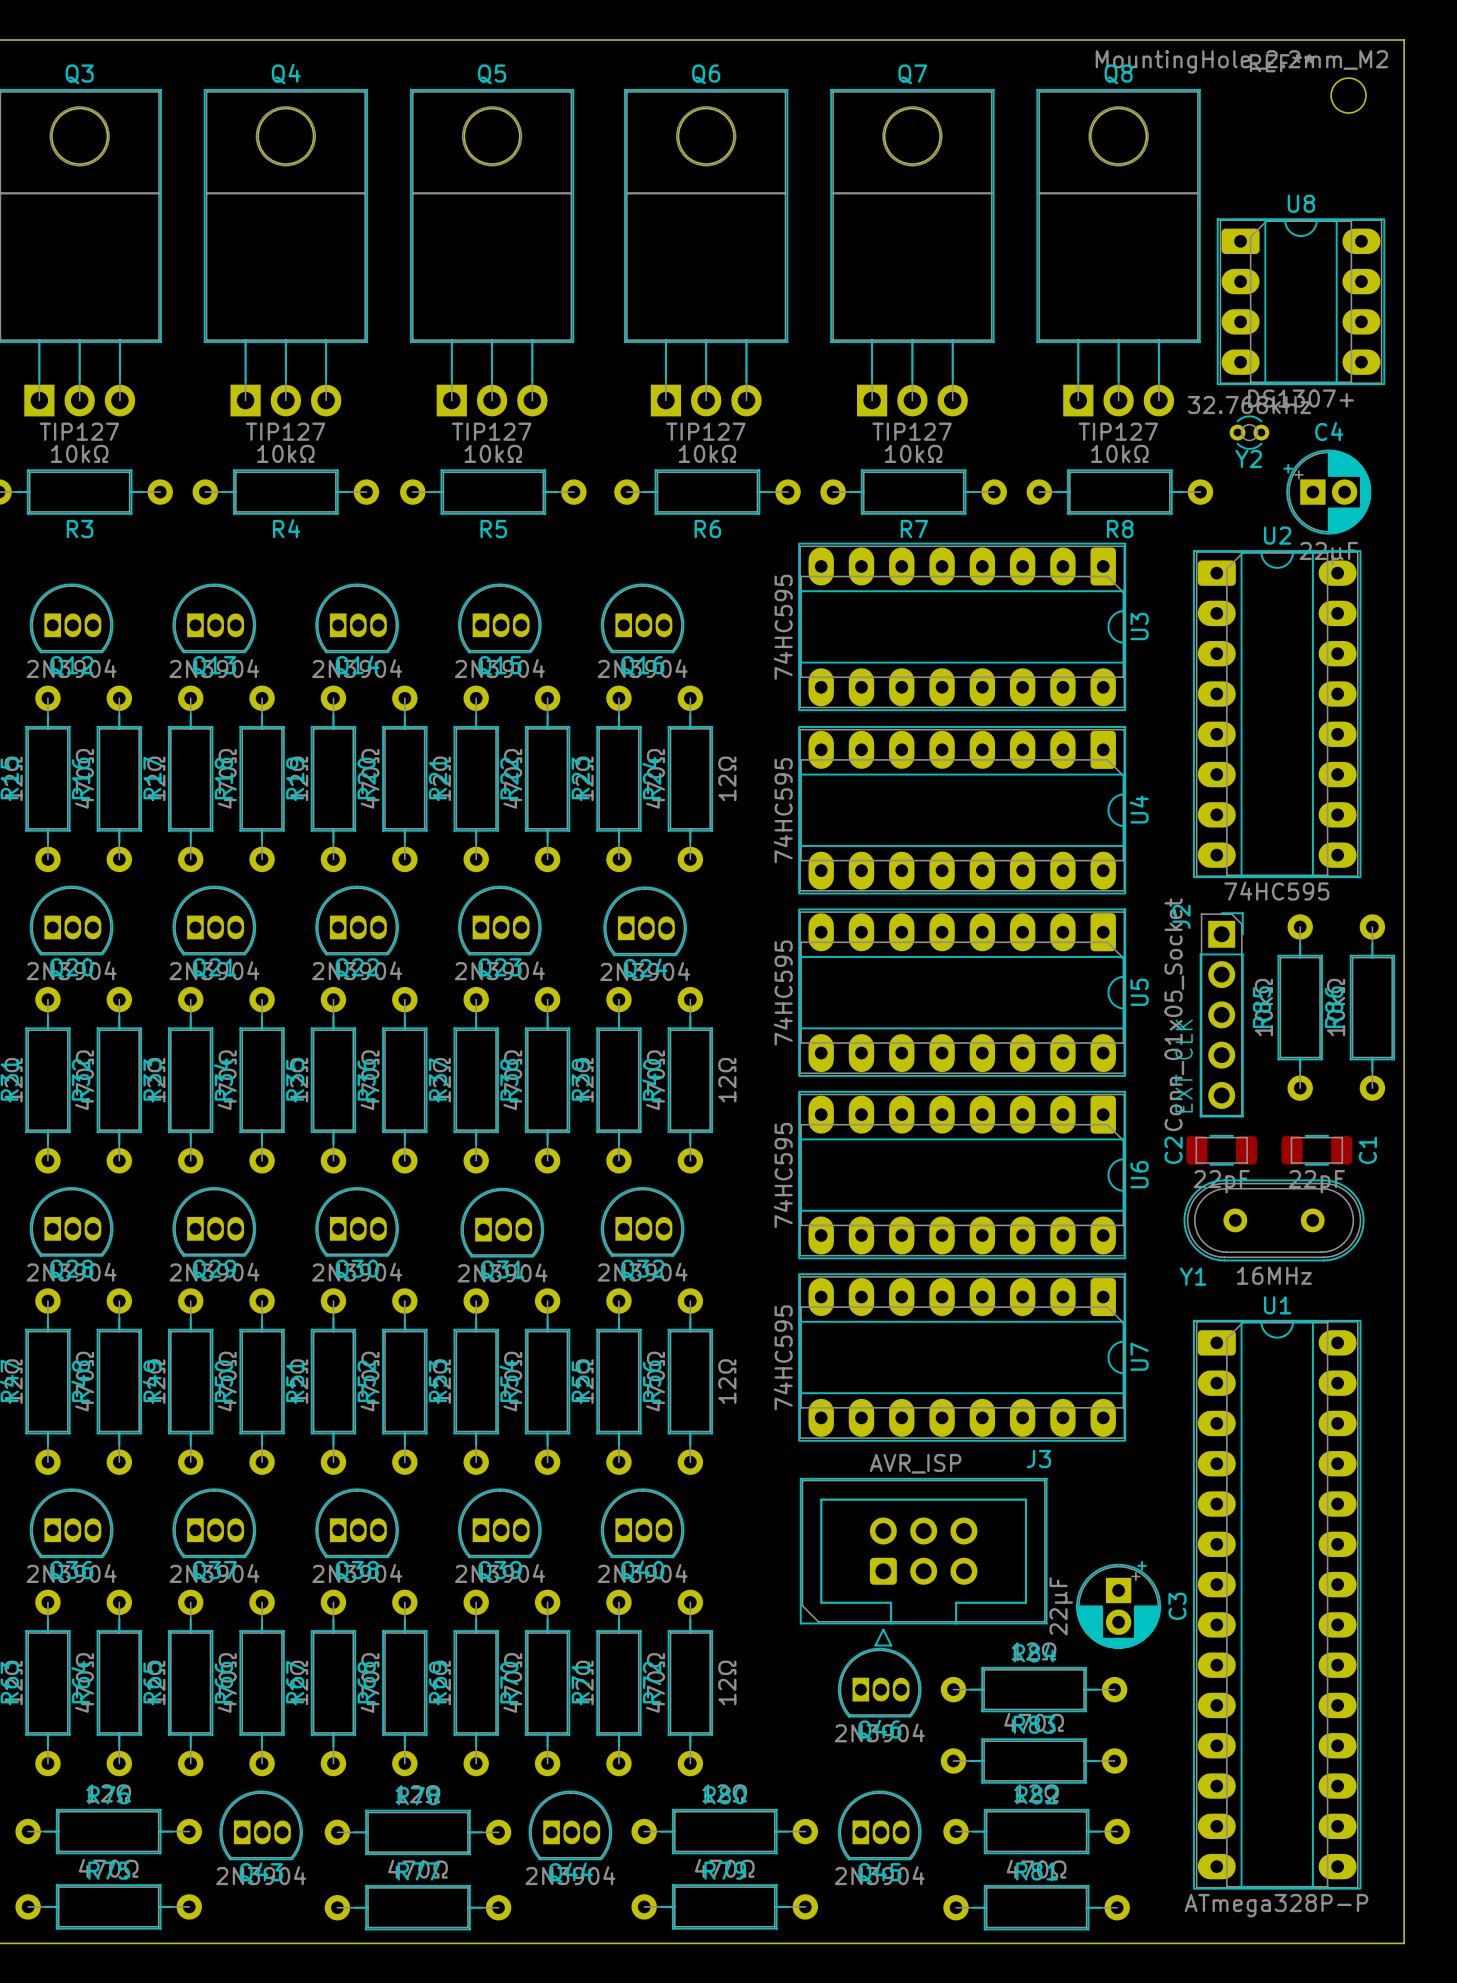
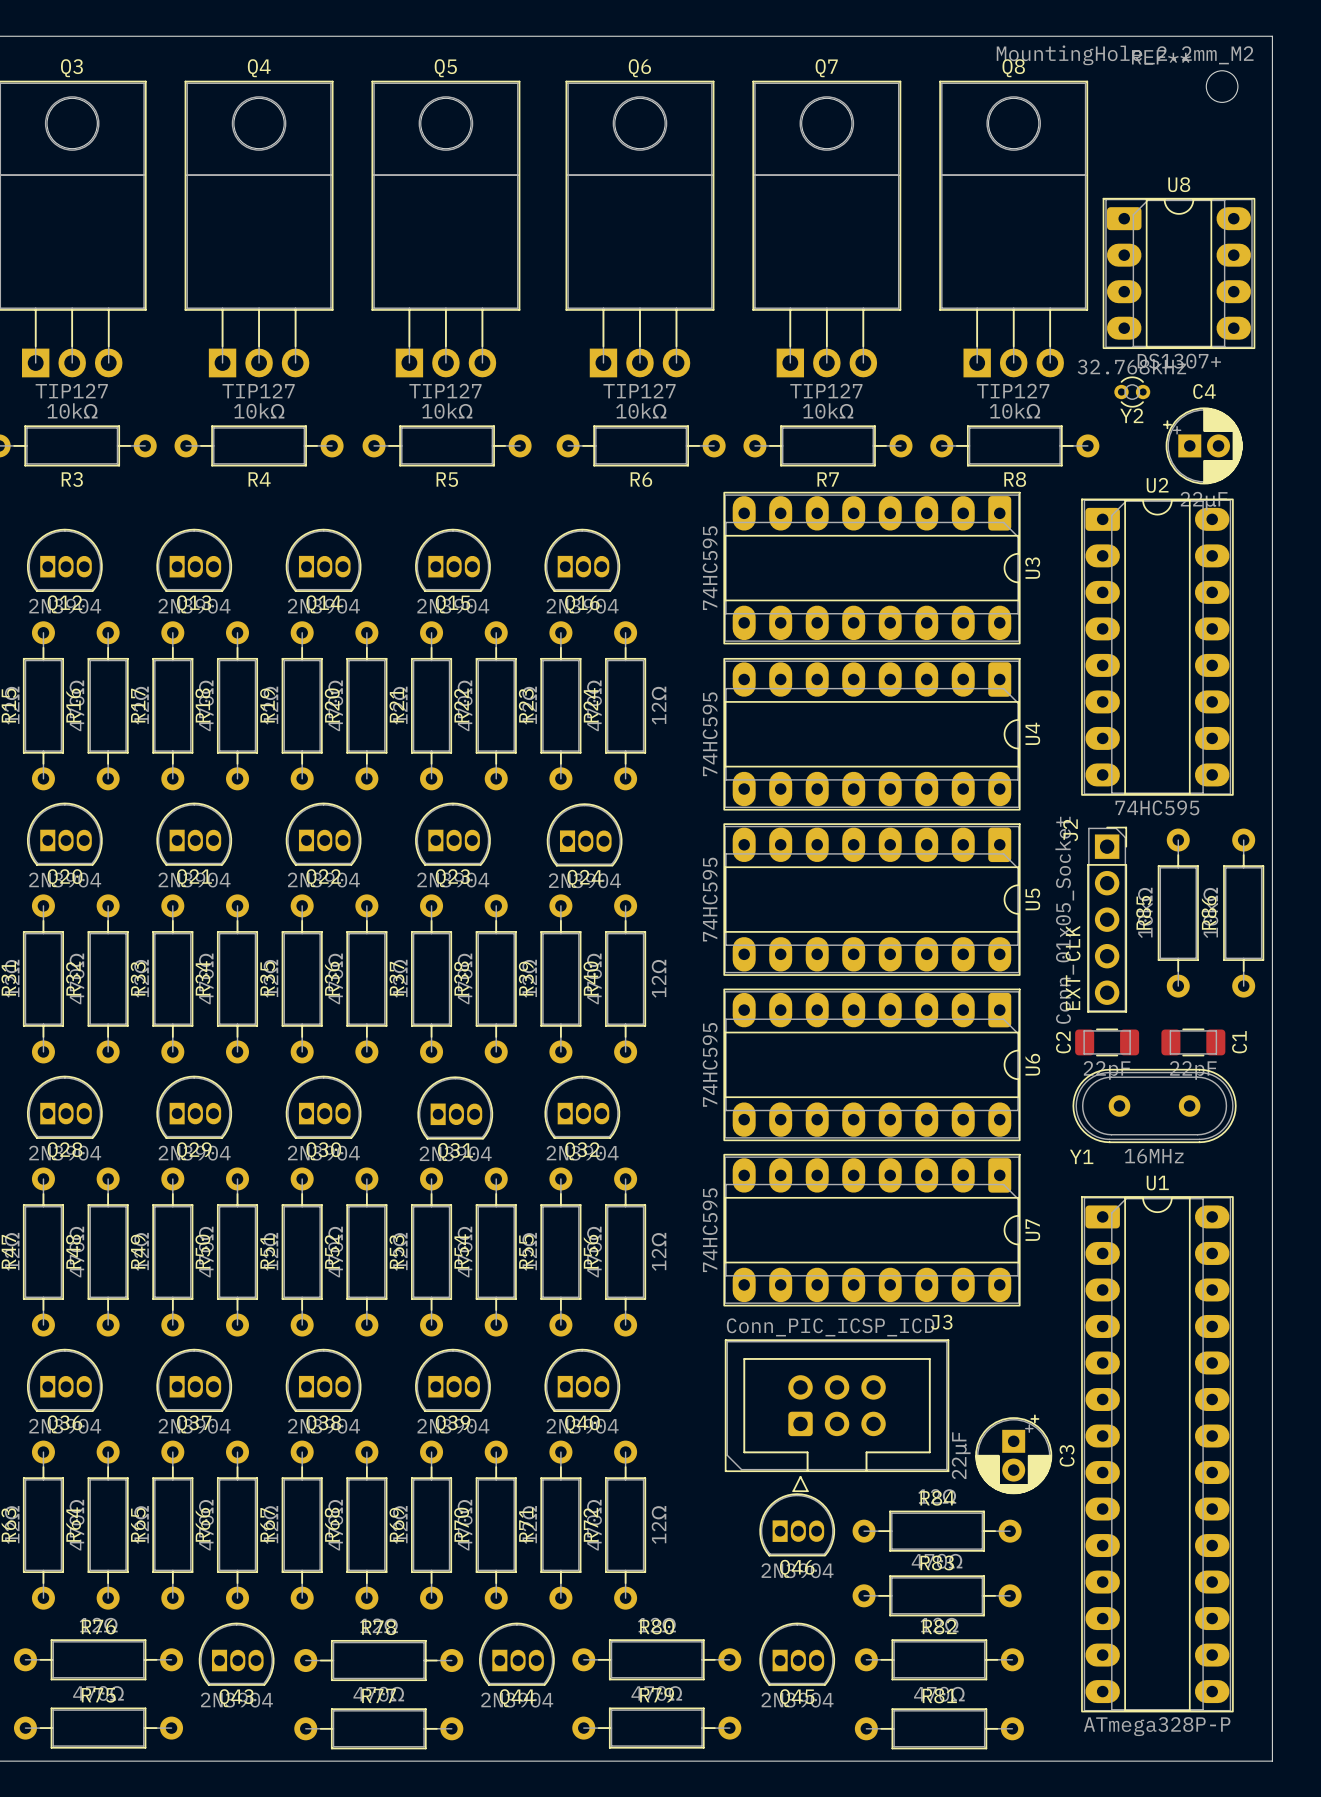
J3 value: AVR_ISP (915, 1463) -> Conn_PIC_ICSP_ICD (830, 1327)

